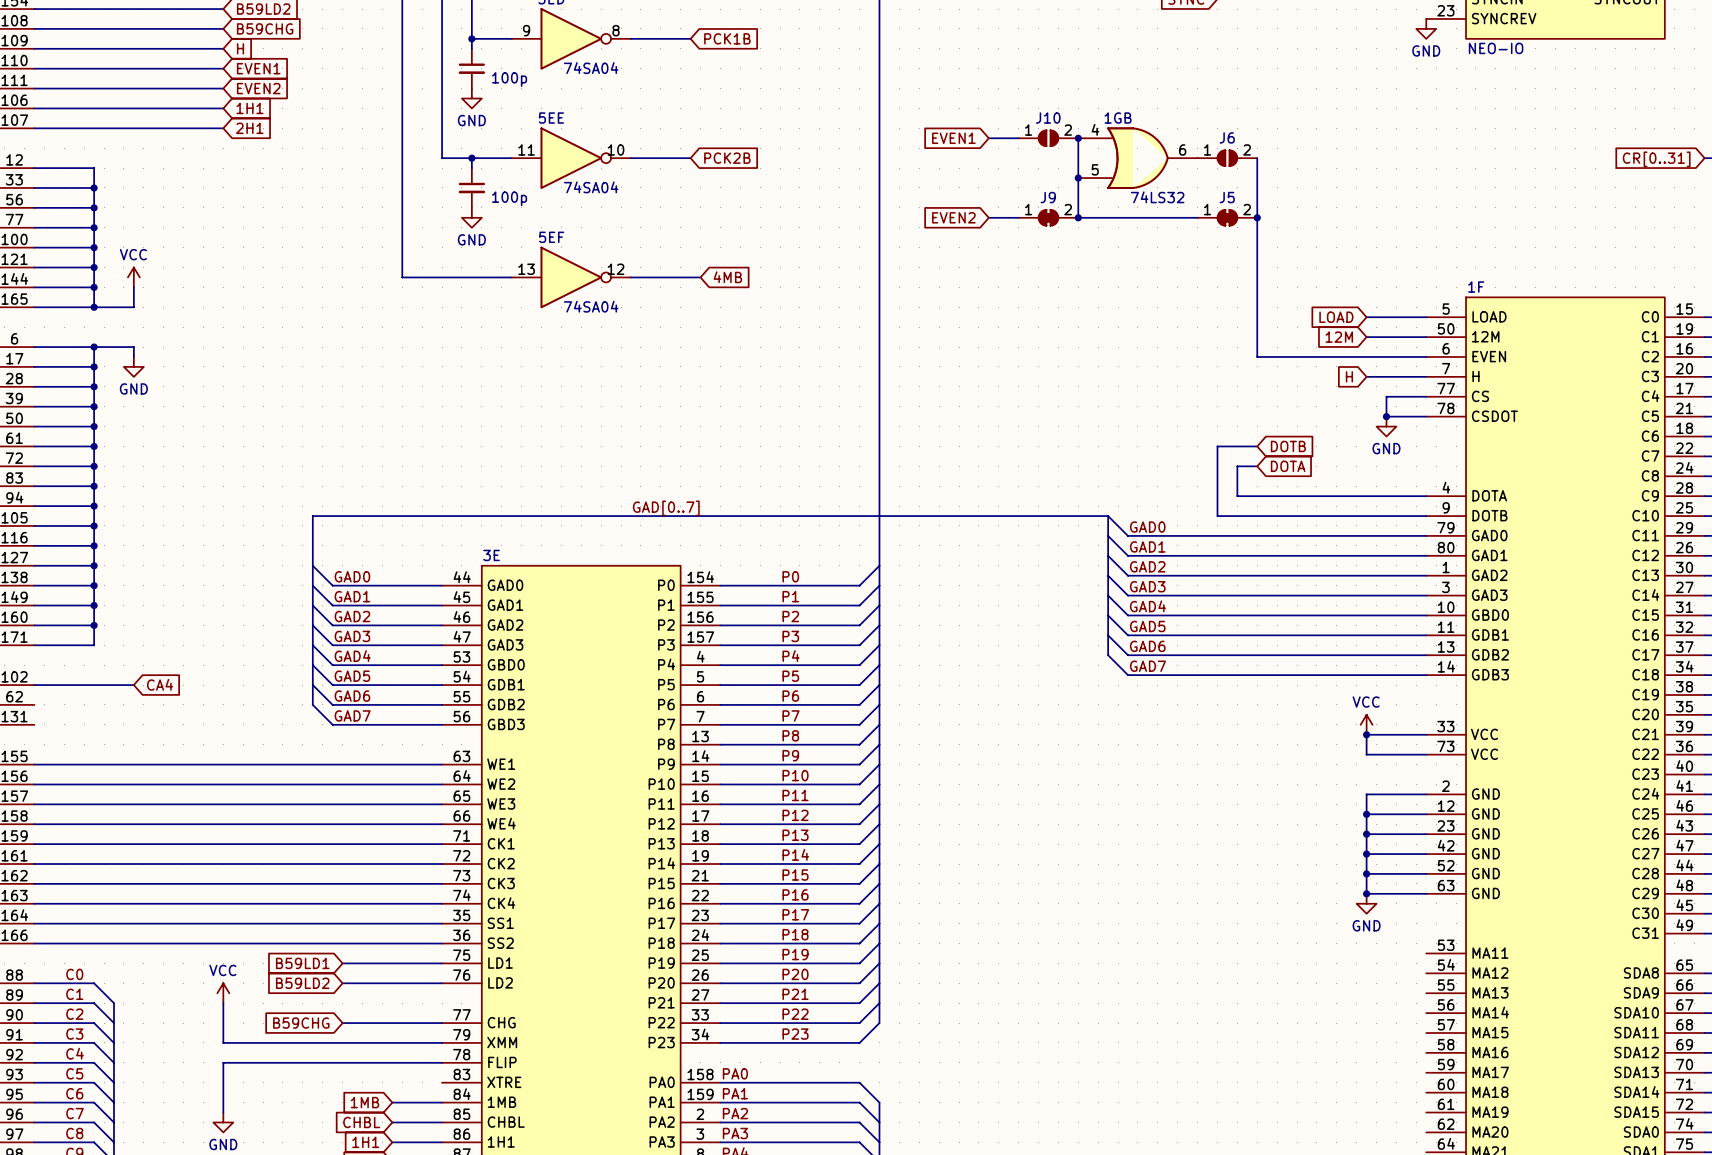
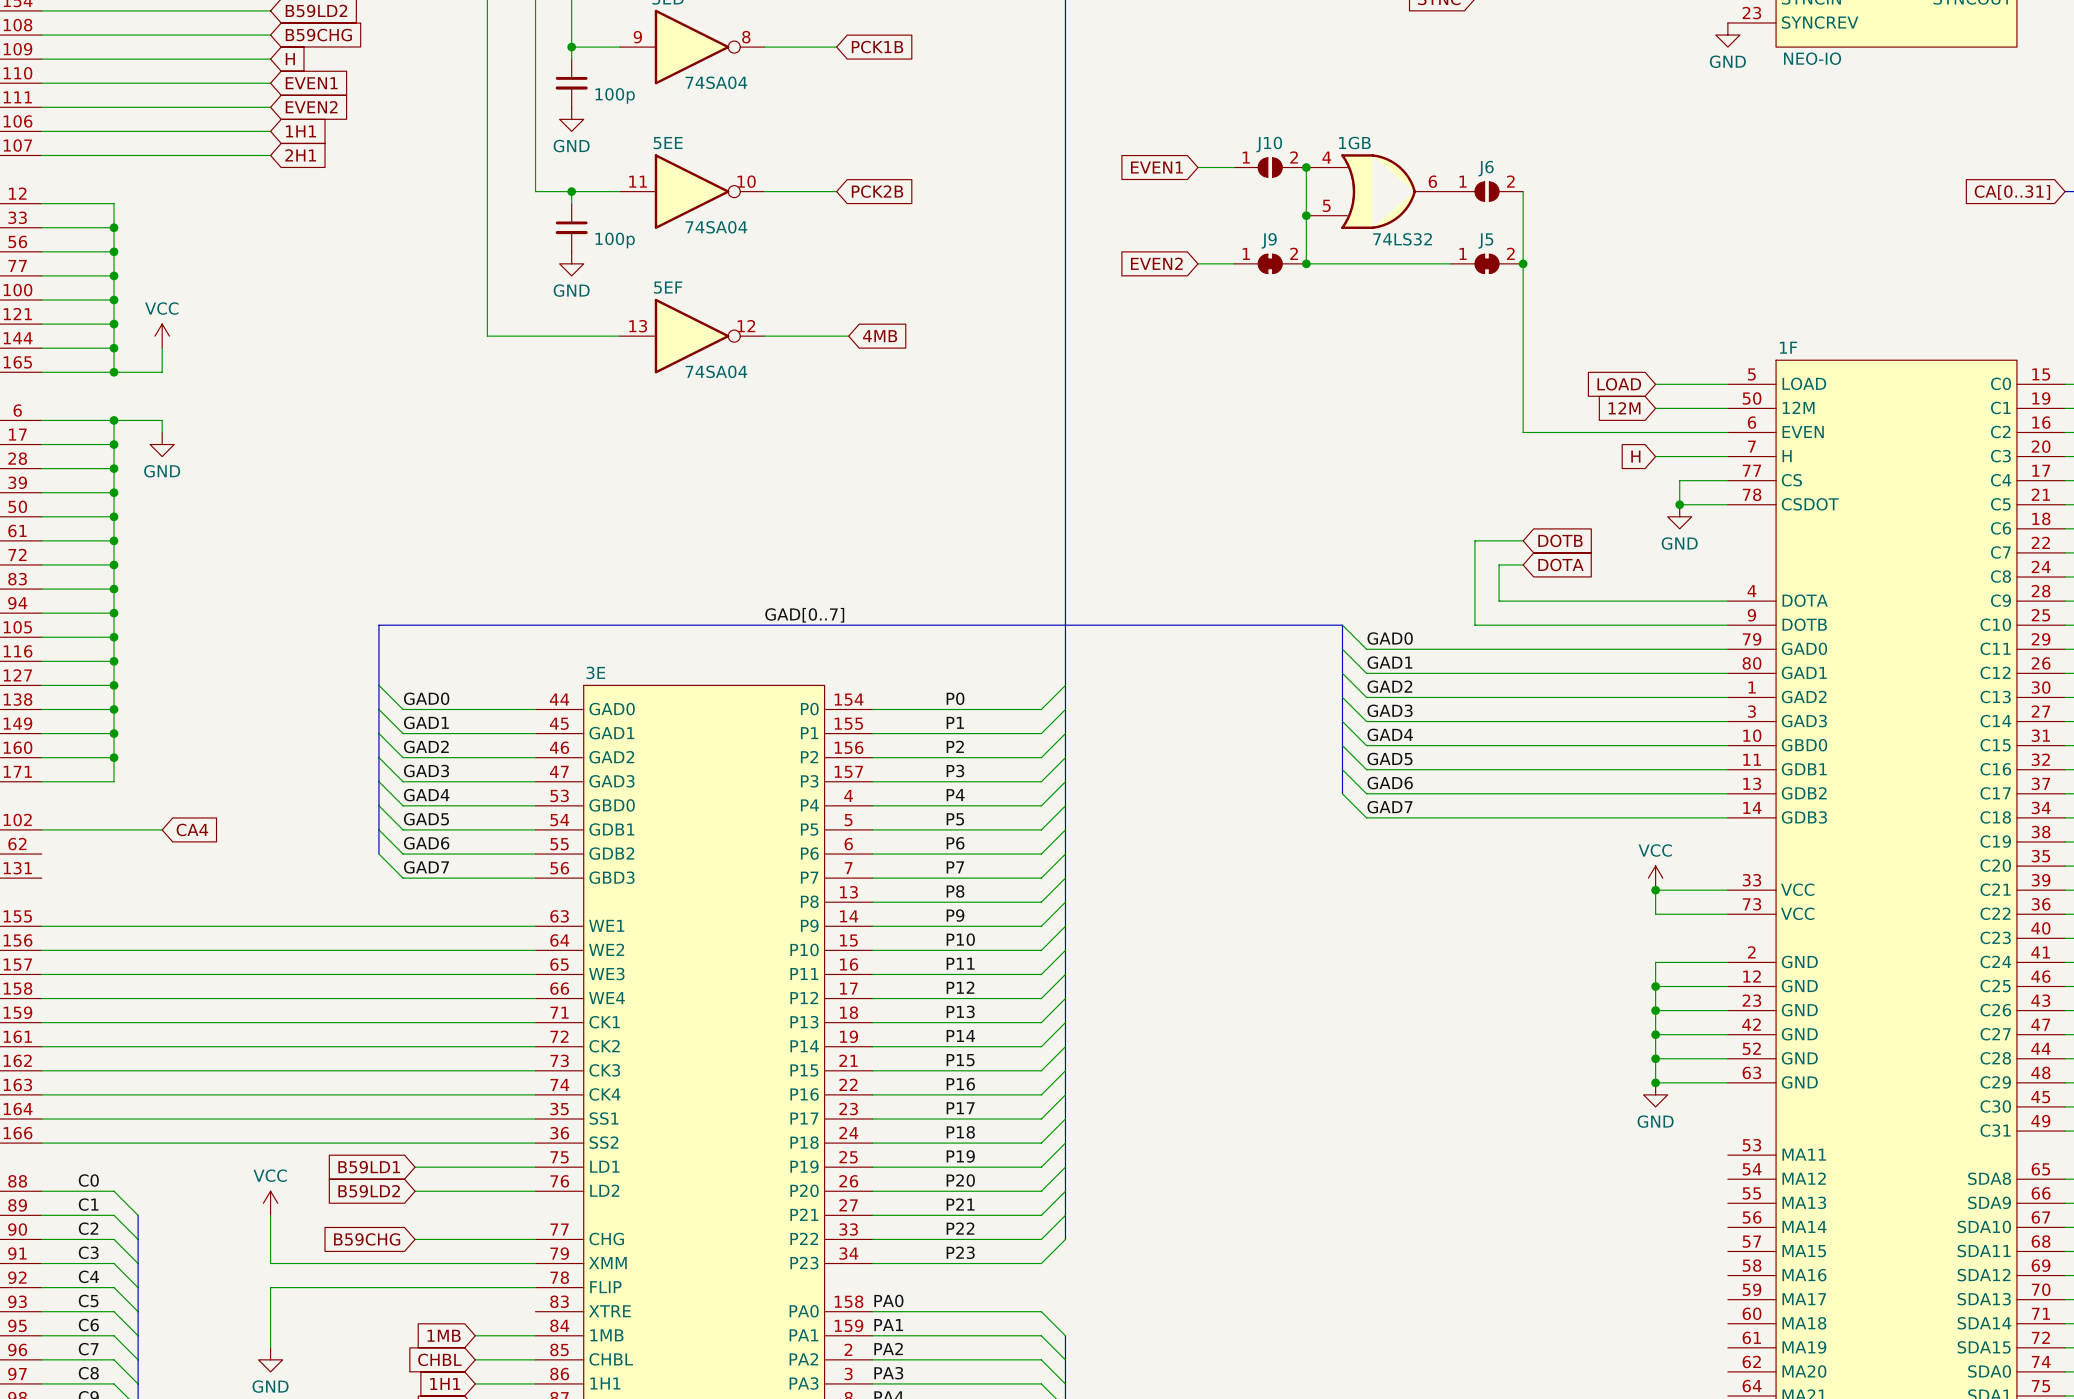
global label: CR[0..31] (1656, 159) -> CA[0..31] (2012, 192)

